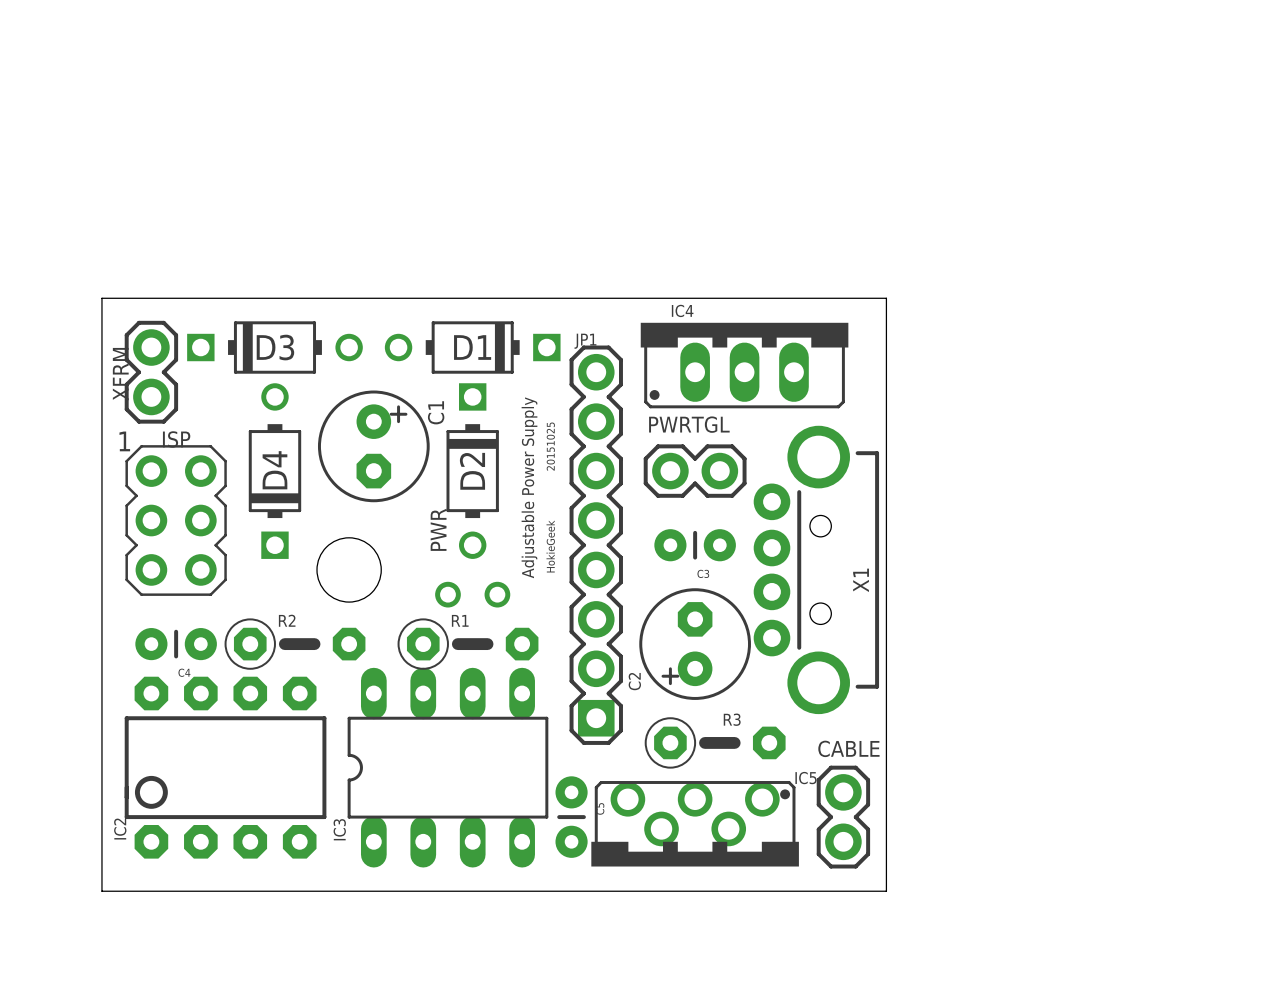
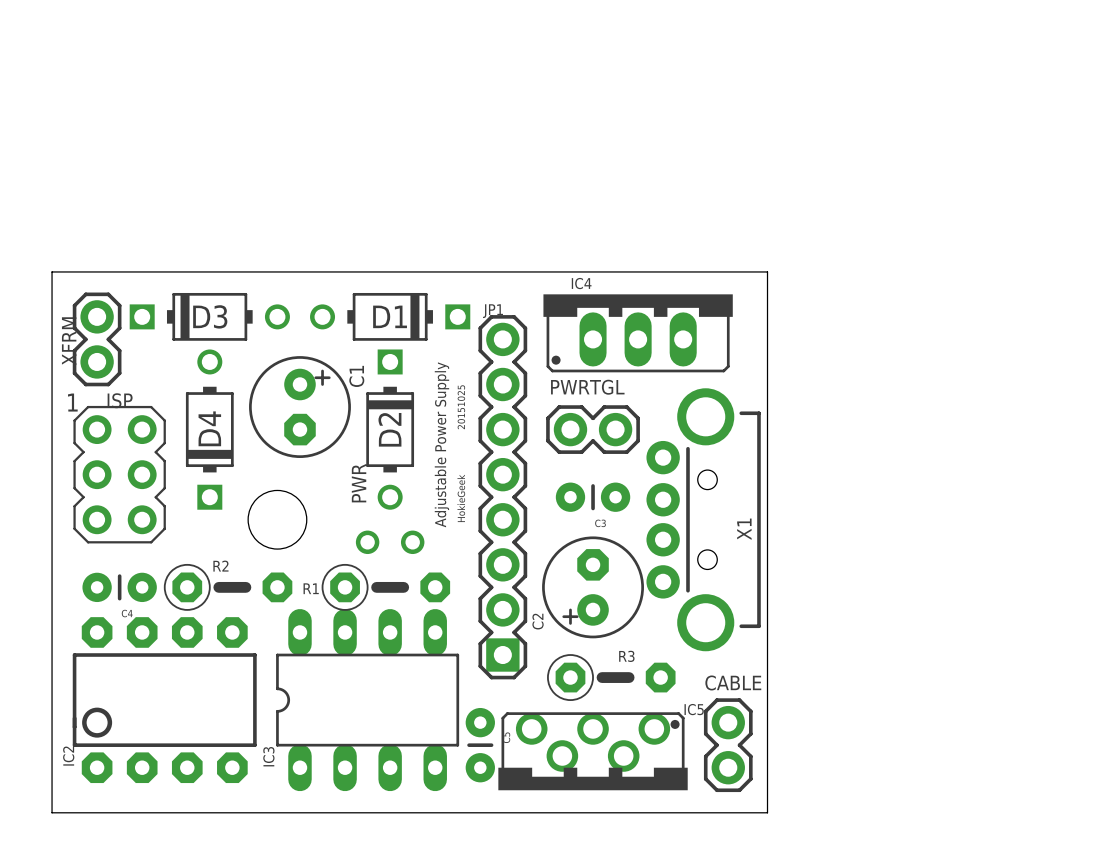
R1 name position: R1 (460, 620) -> R1 (311, 588)

